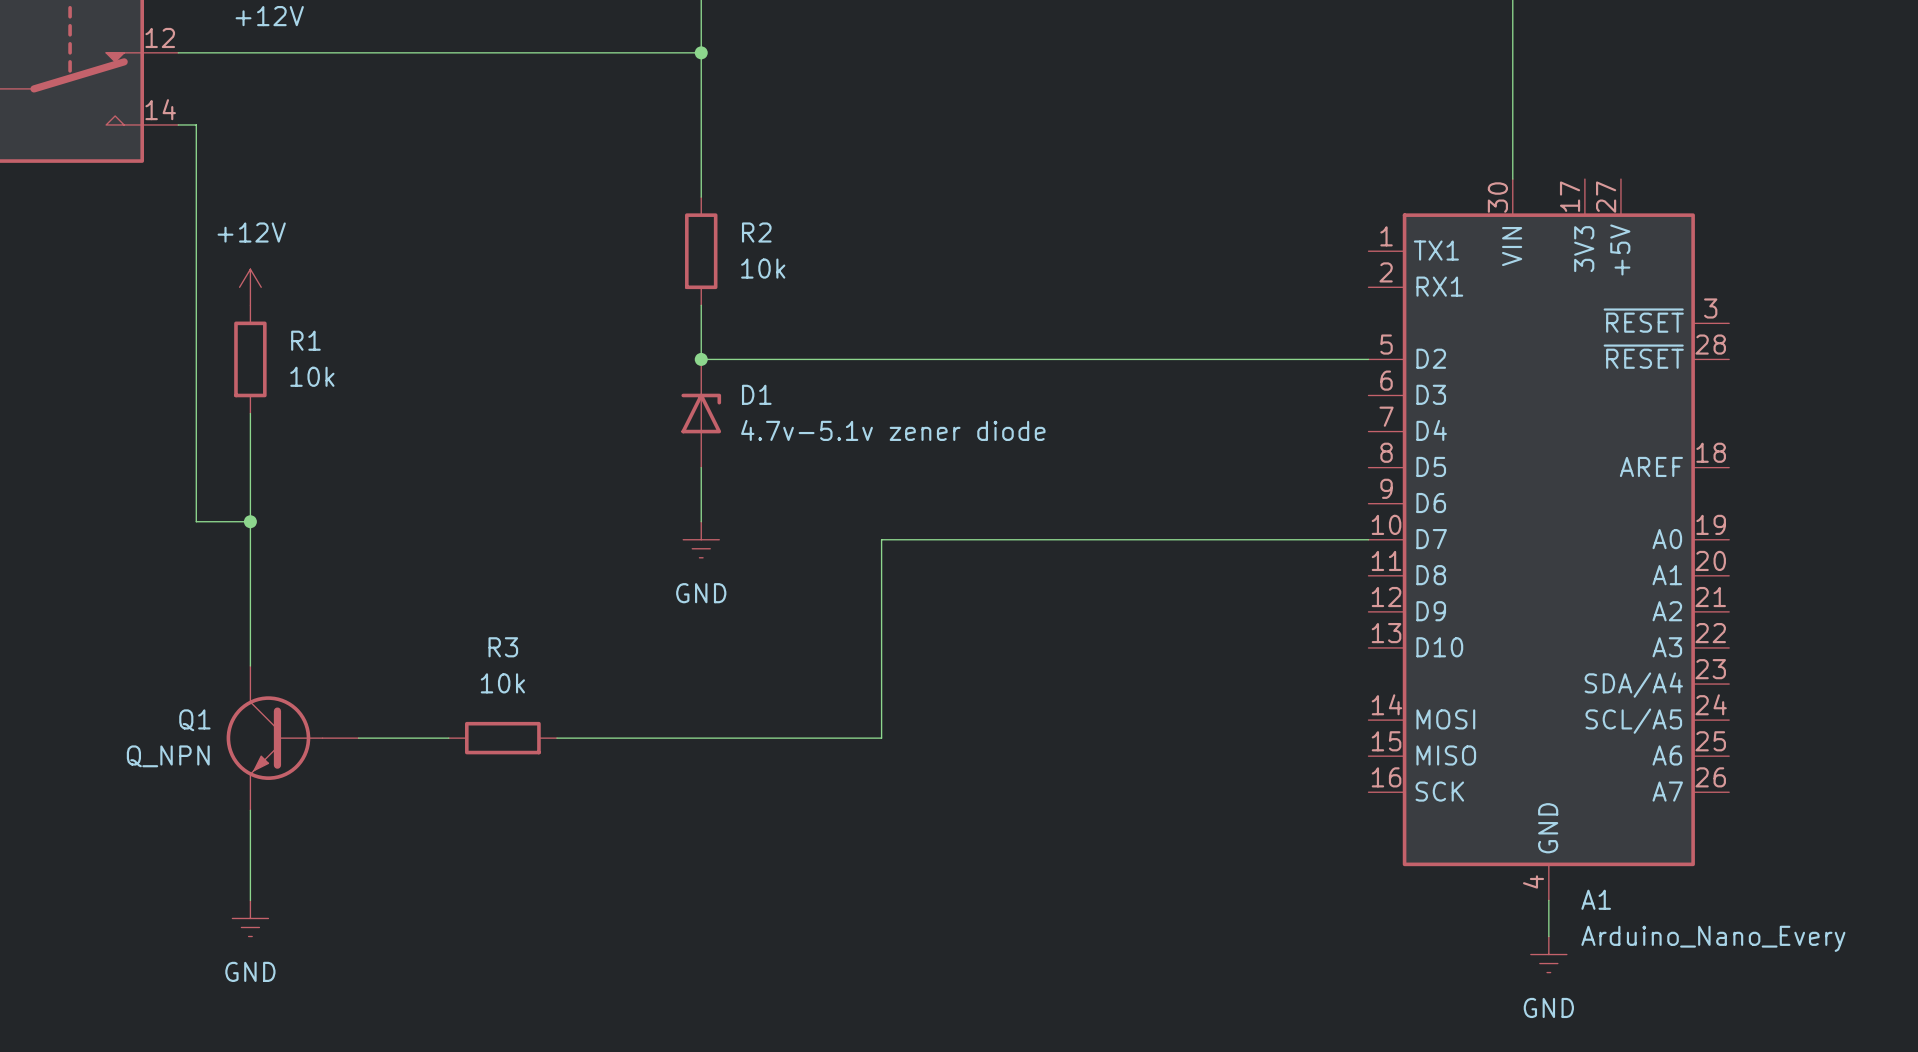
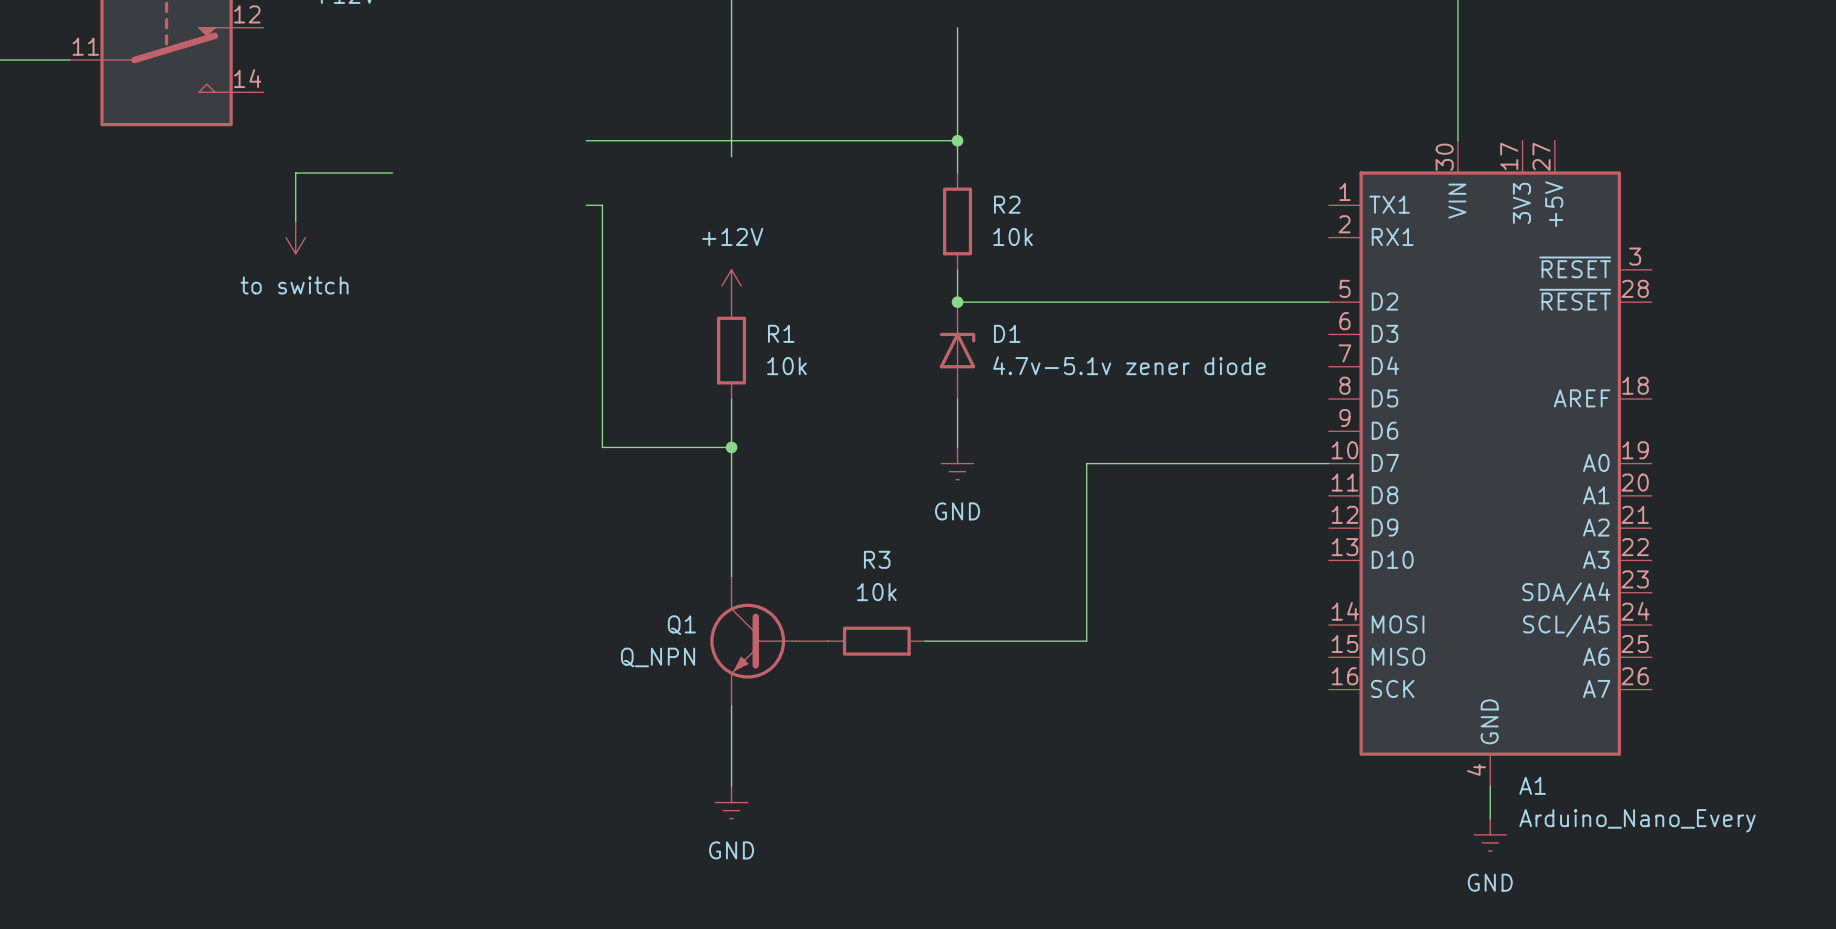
wire: (178, 52) (701, 52) -> none
junction: (701, 52) -> none
wire: none -> (957, 27) (957, 173)
wire: (178, 124) (196, 124) (196, 521) (250, 521) -> none
wire: none -> (586, 140) (957, 140)
junction: none -> (957, 140)
wire: none -> (392, 173) (295, 173) (295, 221)
wire: none -> (586, 205) (602, 205) (602, 447) (731, 447) (731, 576)
R2 position: (701, 251) -> (957, 221)
power symbol: none -> to switch (295, 237)
power symbol: +12V (250, 287) -> none
wire: (701, 305) (701, 359) (953, 359) -> (957, 269) (957, 302)
power symbol: none -> +12V (731, 286)
R1 position: (250, 359) -> (731, 350)
junction: (701, 359) -> none
junction: none -> (957, 302)
wire: (250, 413) (250, 665) -> none
D1 position: (701, 413) -> (957, 350)
wire: none -> (957, 399) (957, 447)
junction: (250, 521) -> none
junction: none -> (731, 447)
power symbol: GND (701, 539) -> none
power symbol: none -> GND (957, 463)
wire: (1097, 539) (881, 539) (881, 738) (556, 738) -> (1086, 463) (1086, 641) (925, 641)
Q1 position: (292, 738) -> (769, 641)
wire: (358, 738) (448, 738) -> none
R3 position: (502, 738) -> (876, 641)
wire: (250, 810) (250, 900) -> none
wire: none -> (731, 705) (731, 786)
power symbol: GND (250, 918) -> none
power symbol: none -> GND (731, 802)

